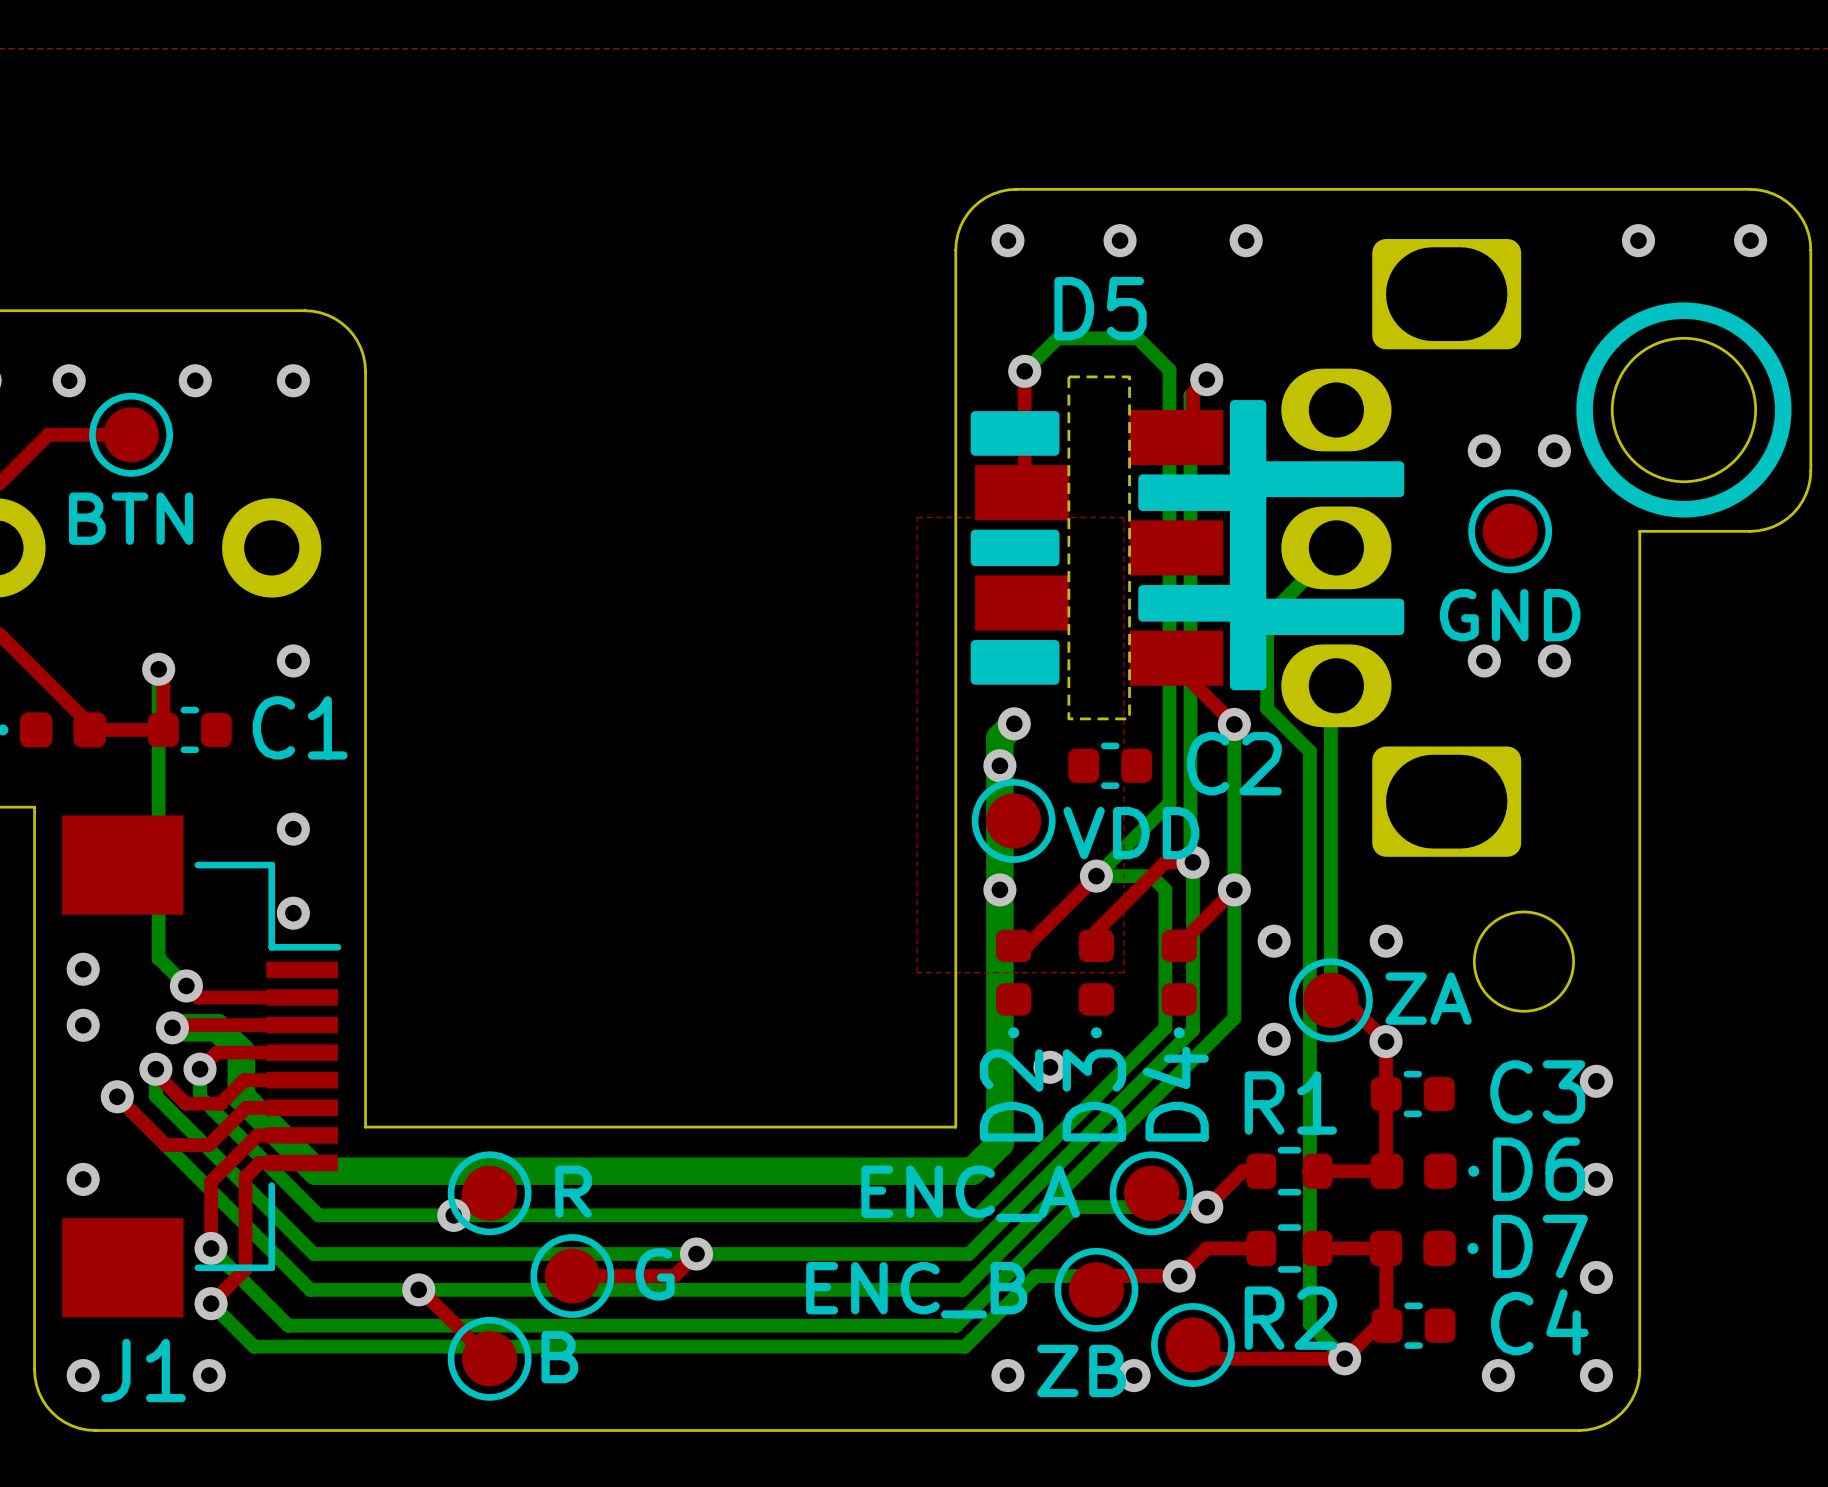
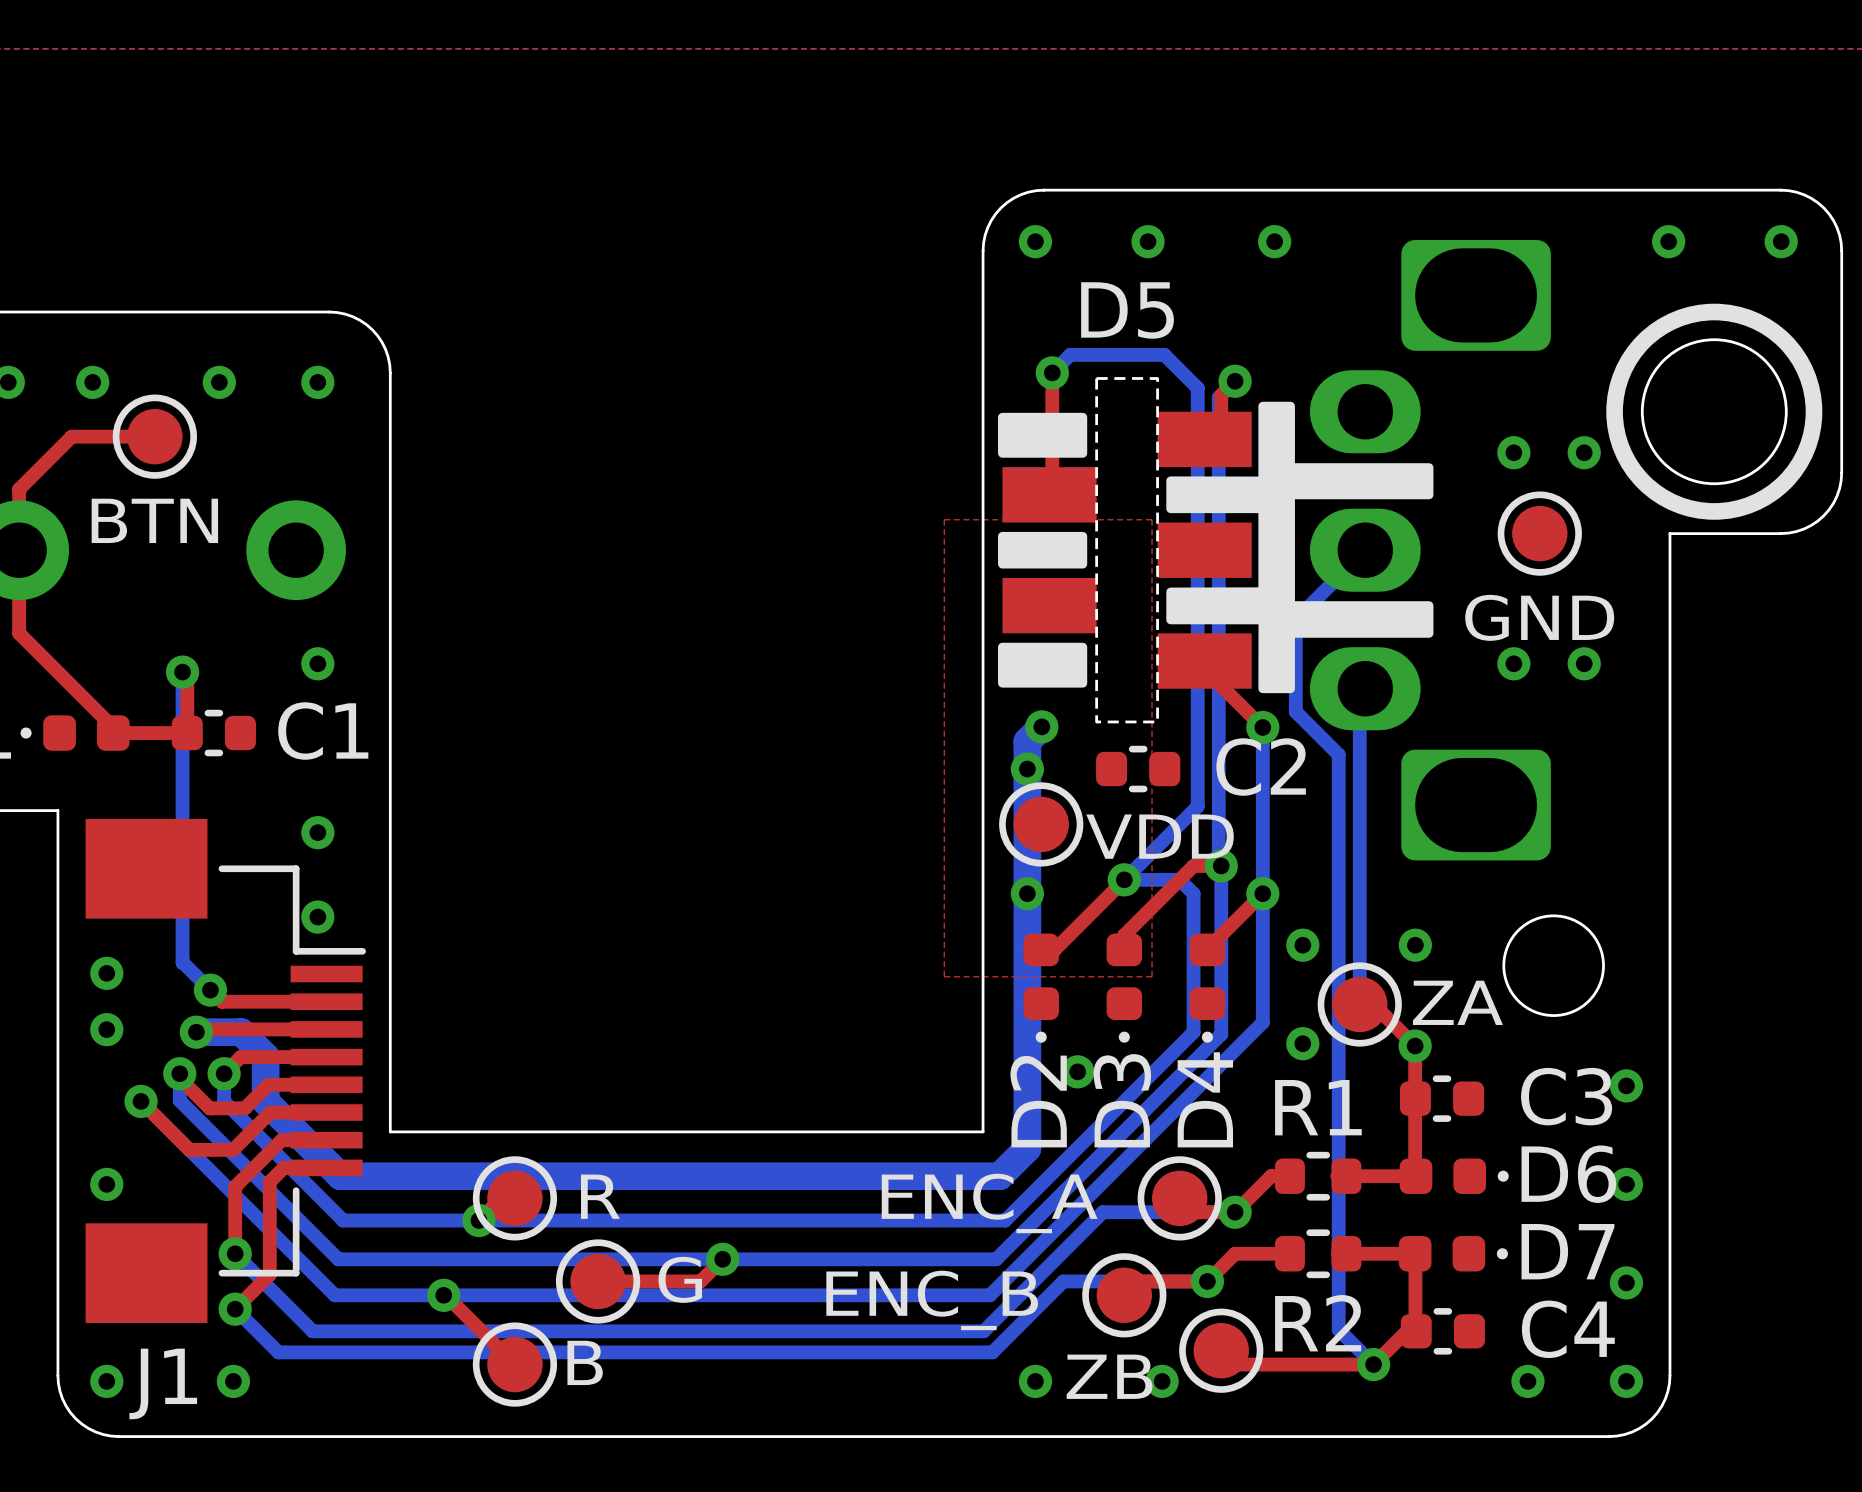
bottom track: (1042, 353) (1057, 338) (1137, 338) (1169, 370) (1169, 386) -> (1070, 354) (1164, 354) (1197, 388)

